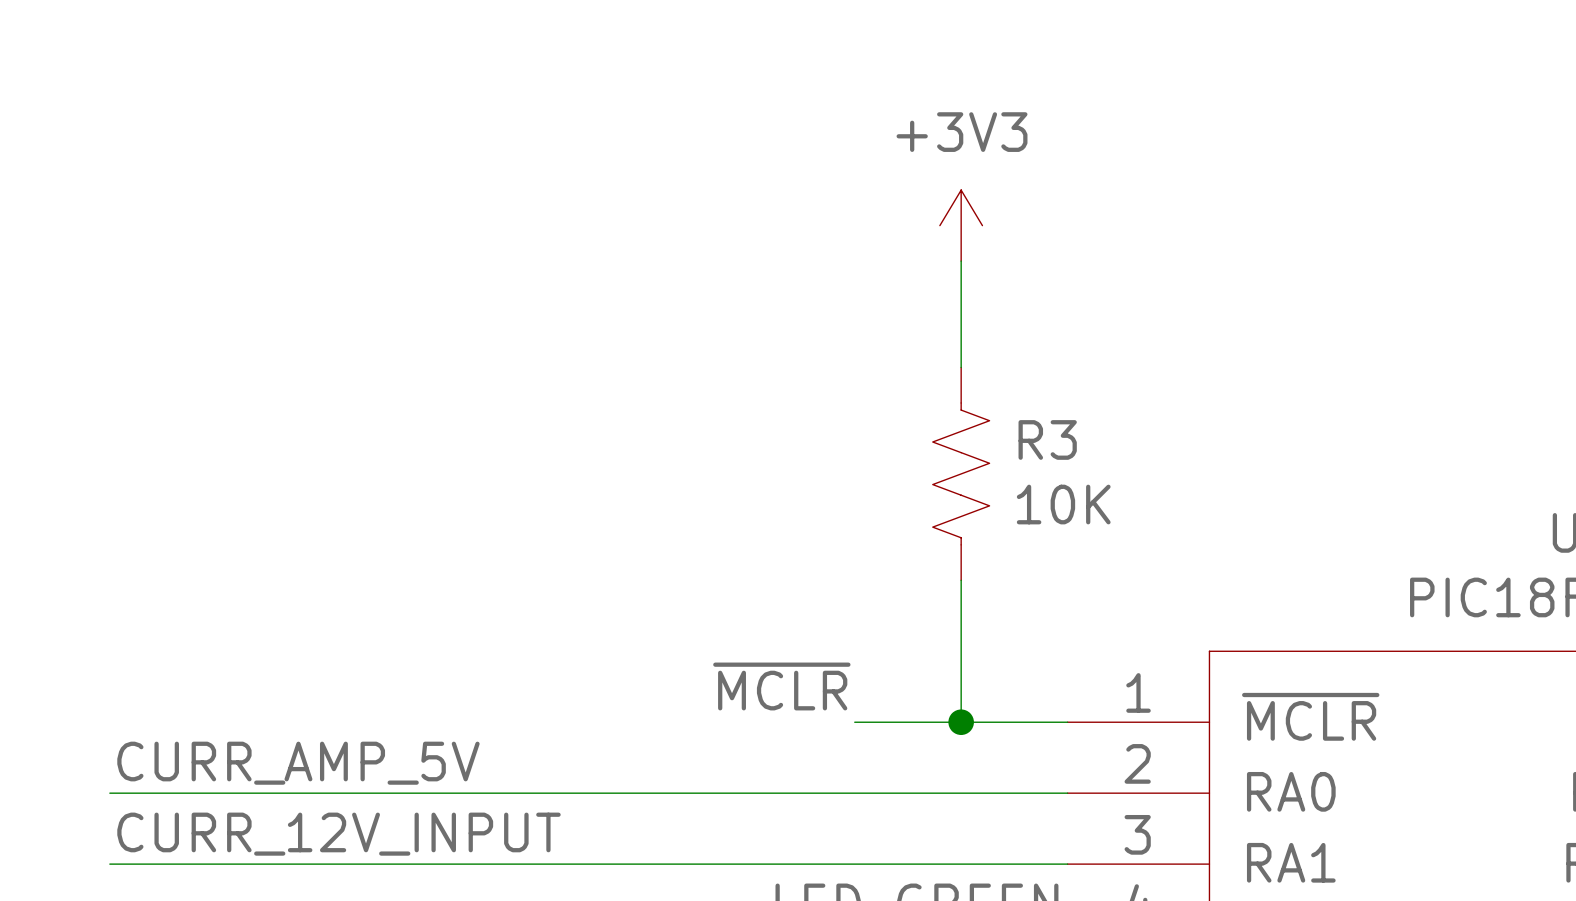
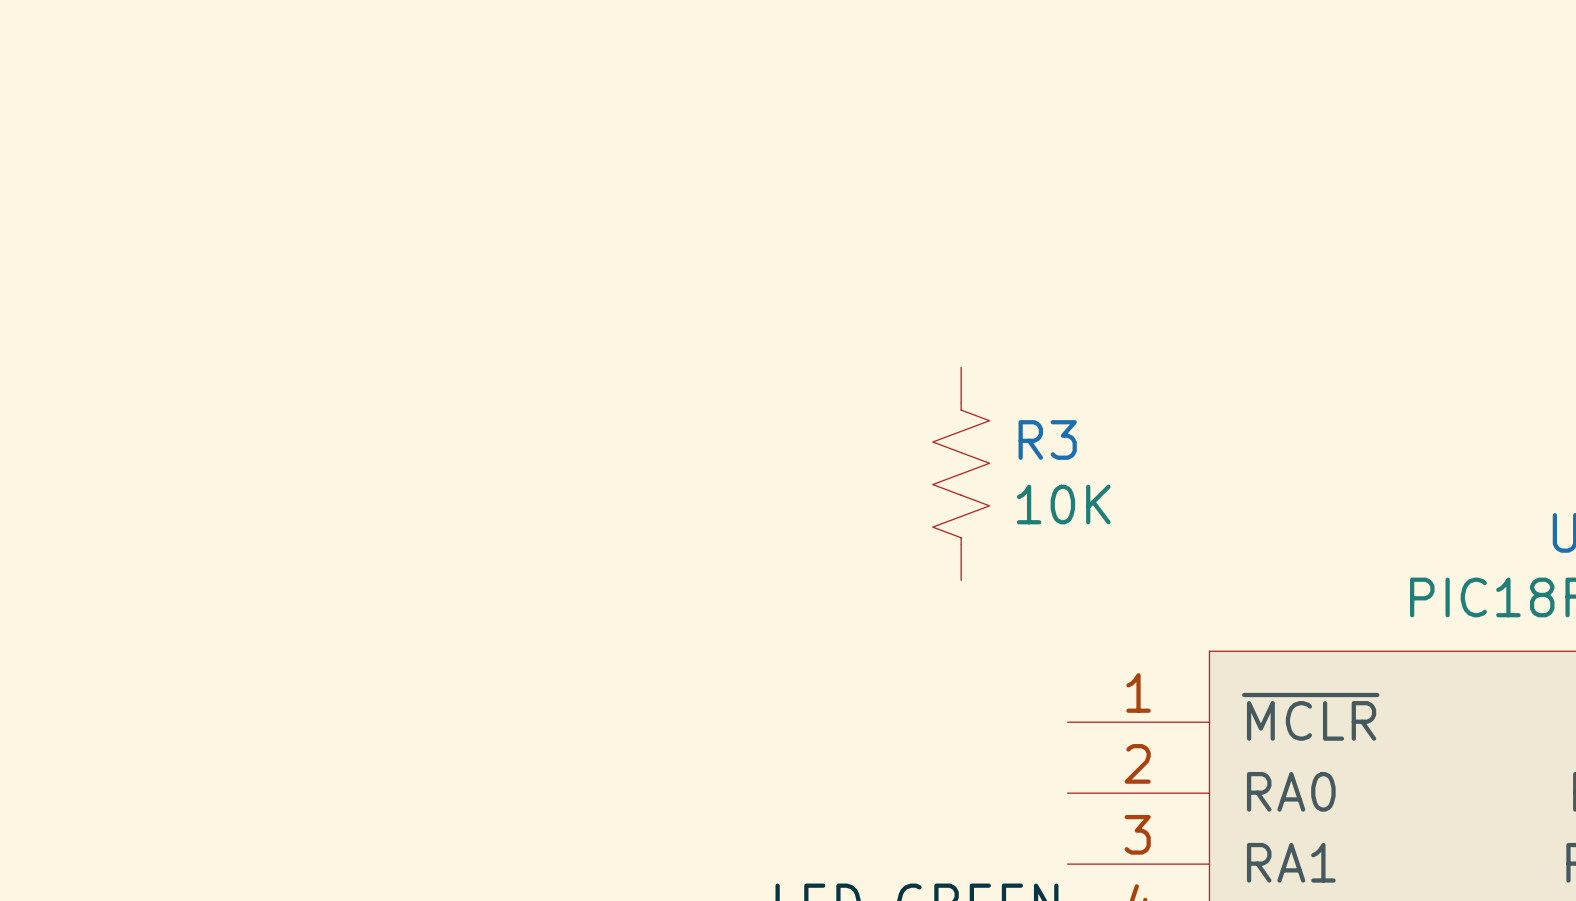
power symbol: +3V3 (961, 225) -> none
wire: (961, 261) (961, 367) -> none
wire: (961, 580) (961, 722) -> none
label: ~{MCLR} (781, 686) -> none
wire: (854, 722) (1067, 722) -> none
junction: (961, 722) -> none
label: CURR_AMP_5V (298, 763) -> none
wire: (109, 793) (1067, 793) -> none
label: CURR_12V_INPUT (338, 834) -> none
wire: (109, 864) (1067, 864) -> none

